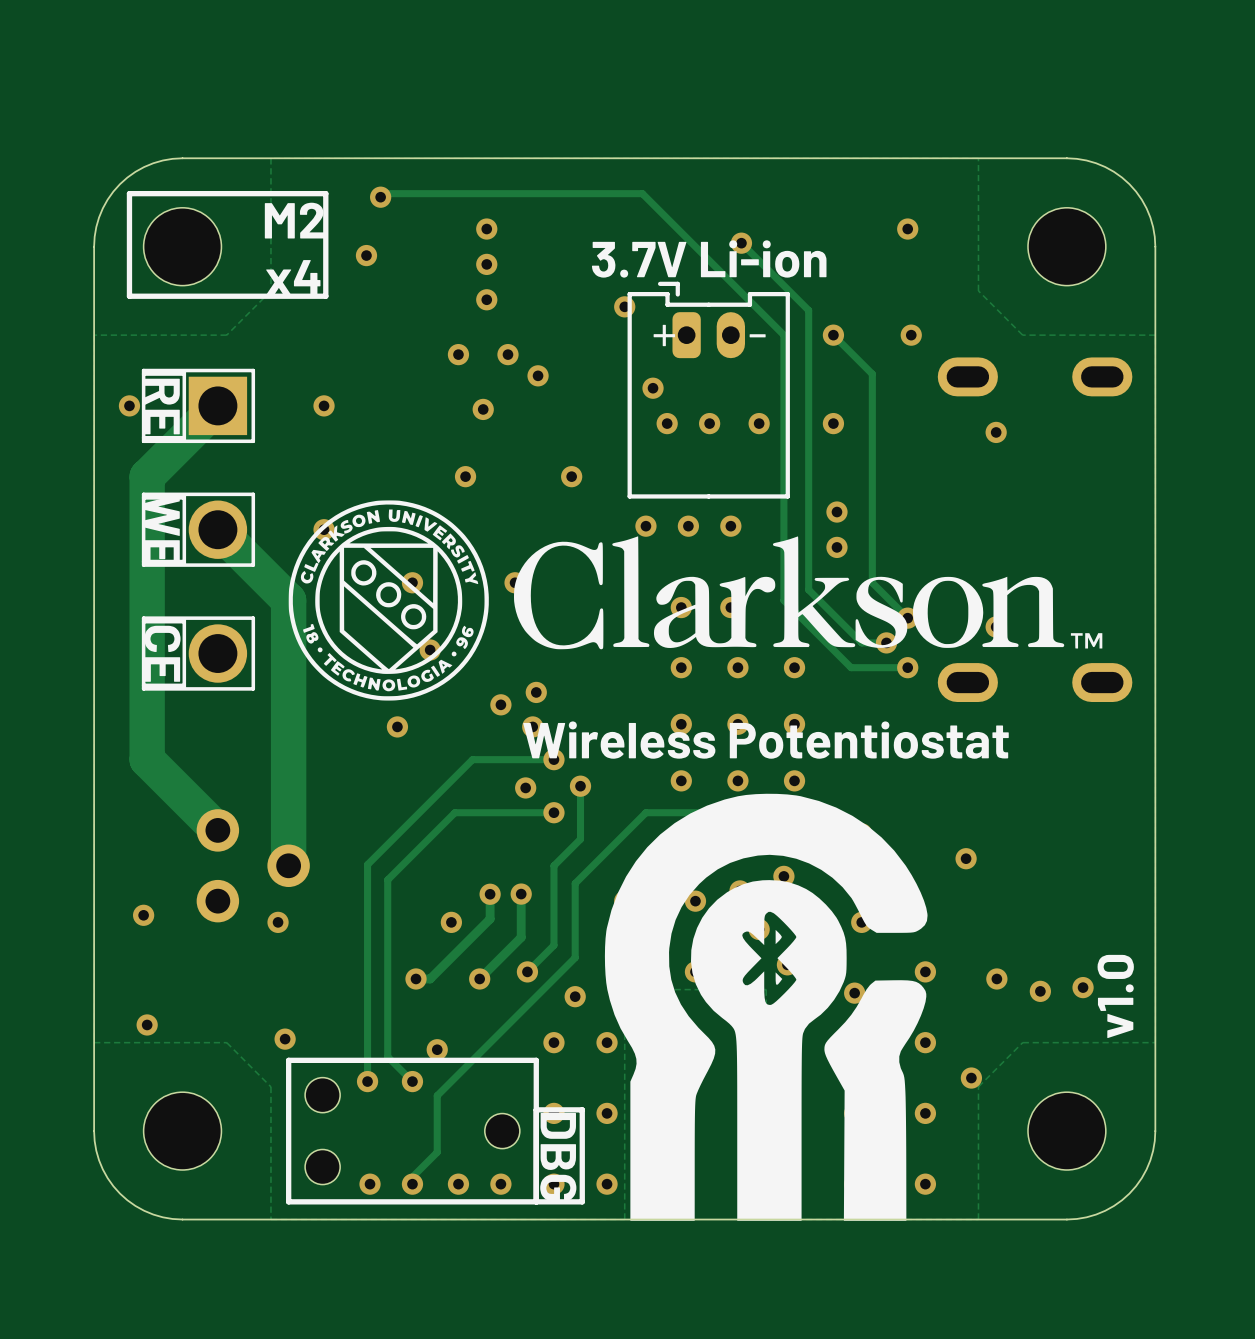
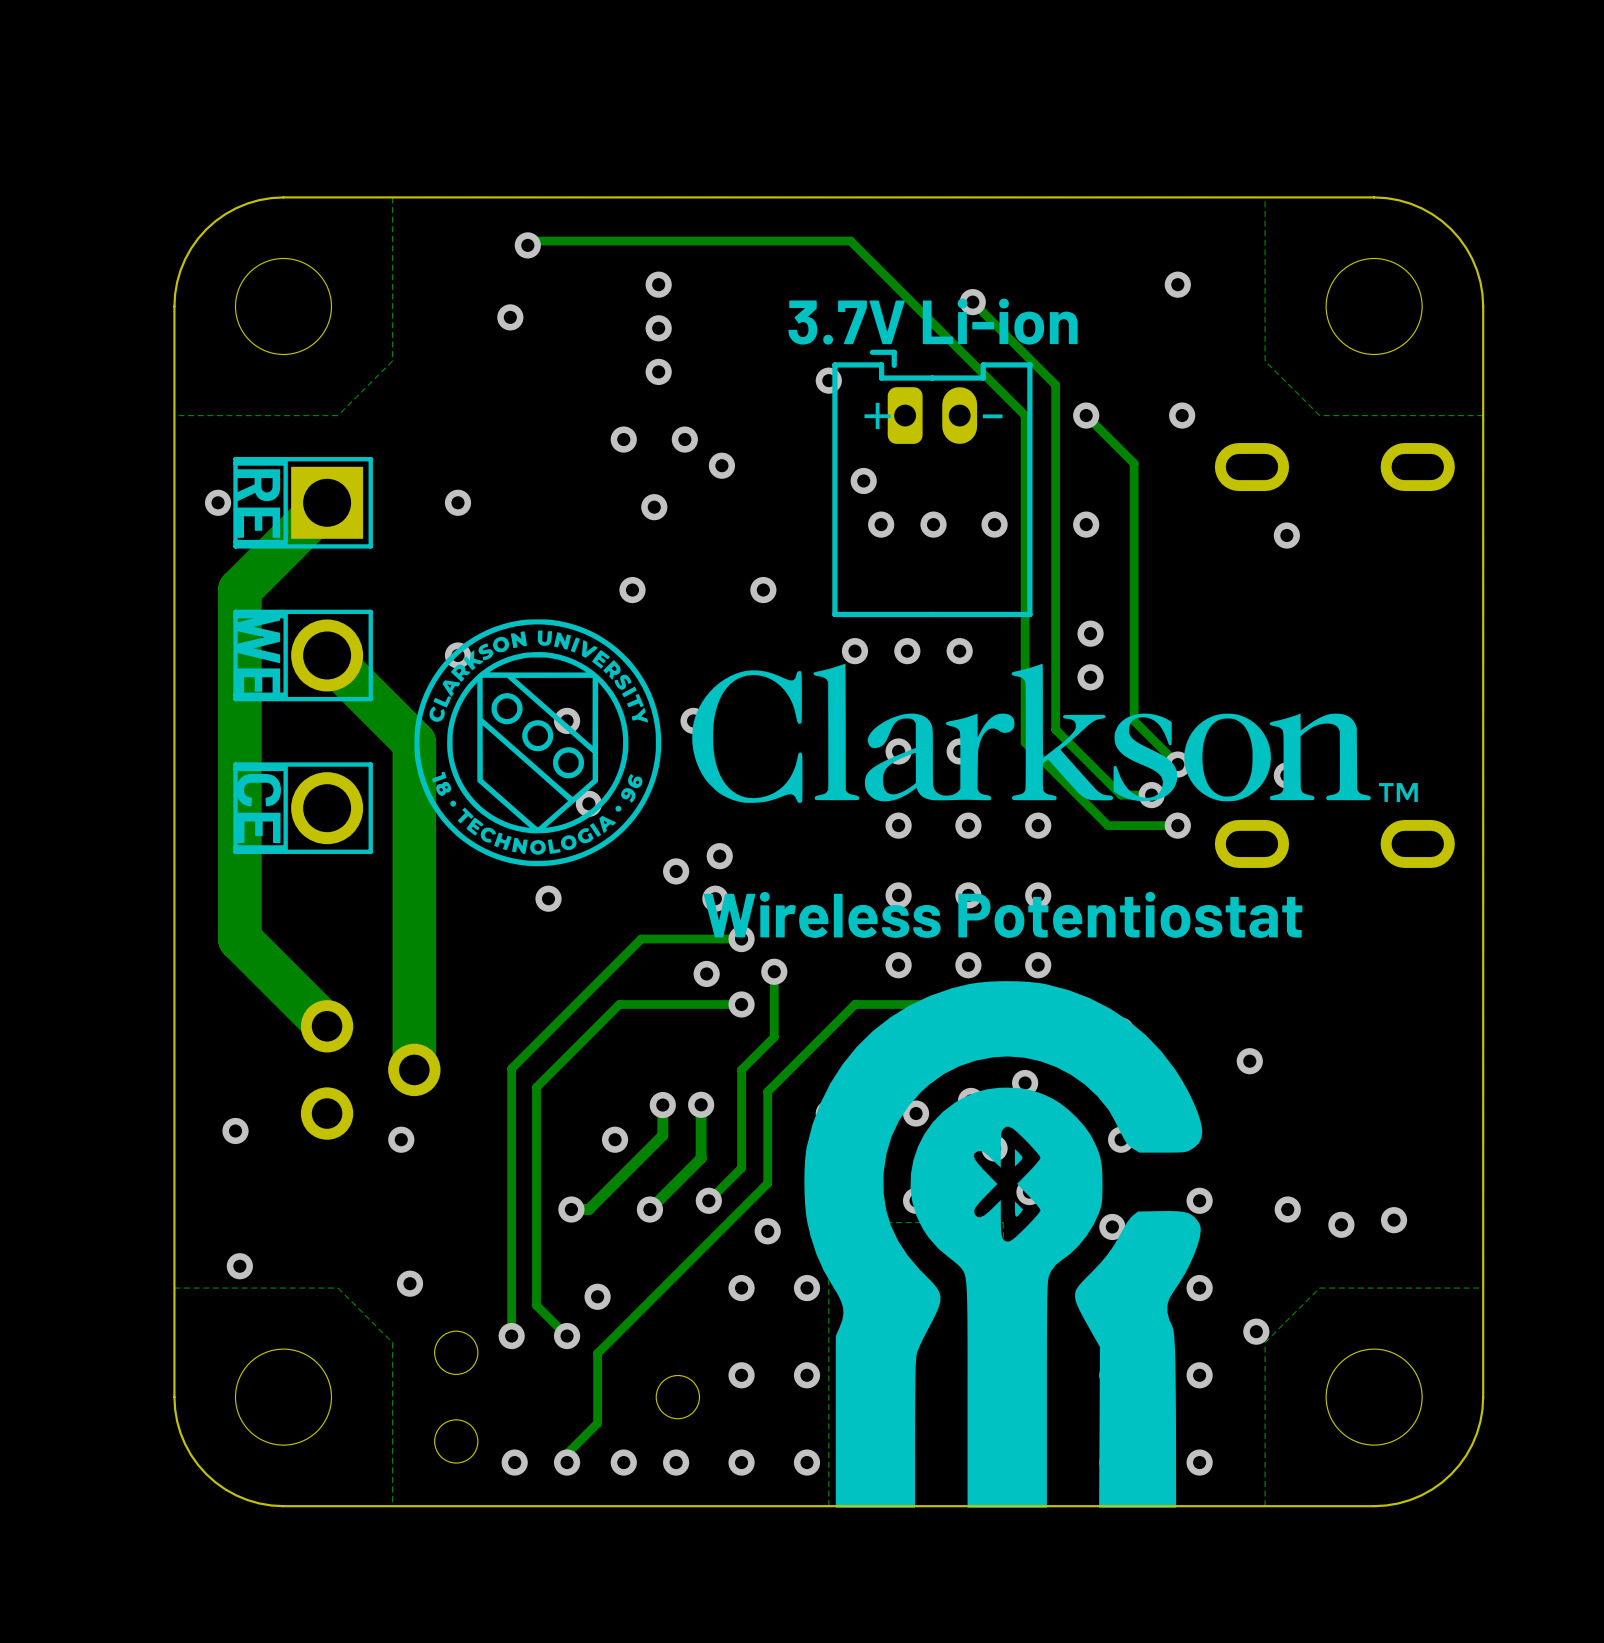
line: (325, 193) (129, 193) (129, 296) (325, 296) (325, 193) -> none
text: M2 (294, 220) -> none
text: x4 (293, 277) -> none
text: v1.0 (1115, 996) -> none
line: (536, 1109) (582, 1109) (582, 1201) (288, 1201) (288, 1060) (536, 1060) (536, 1201) -> none
text: DBG (558, 1156) -> none

